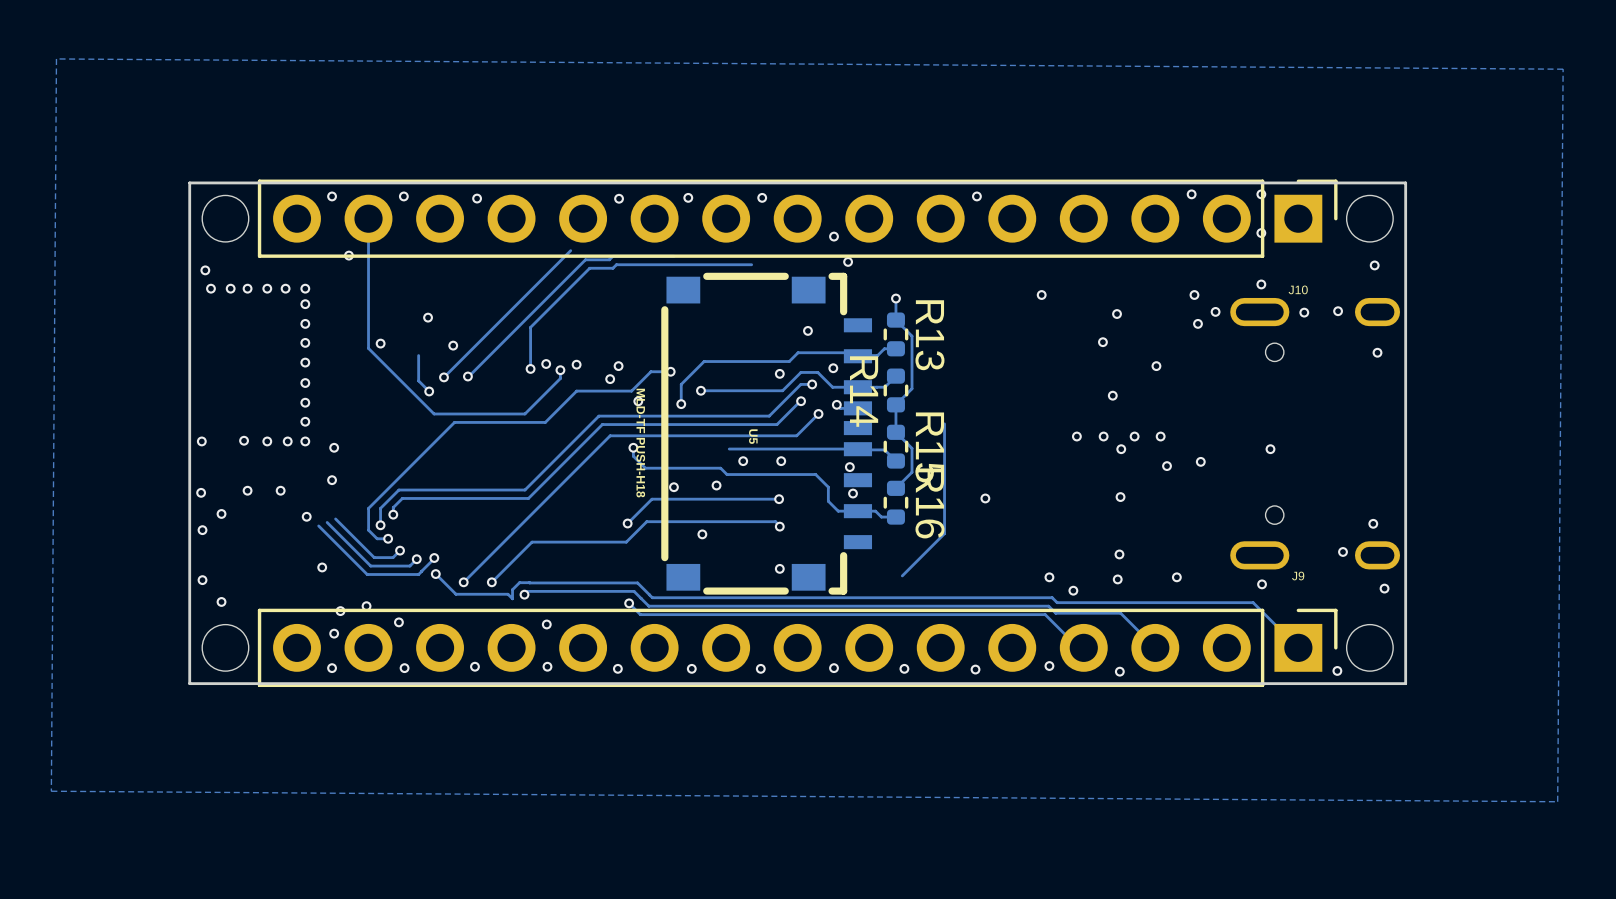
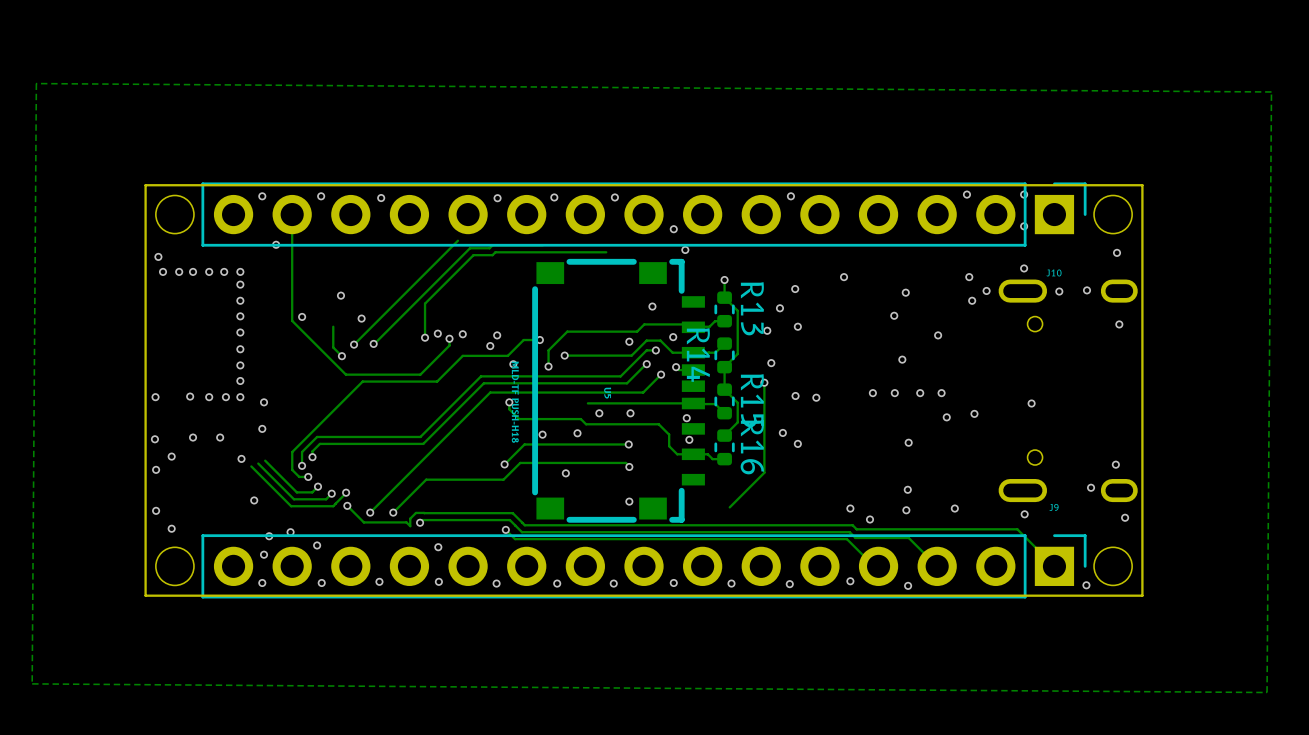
via: none -> (795, 289)
via: none -> (779, 308)
via: none -> (797, 326)
via: none -> (767, 330)
via: none -> (771, 363)
via: none -> (764, 382)
via: none -> (795, 396)
via: none -> (816, 397)
via: (1121, 449) -> none
via: none -> (782, 432)

